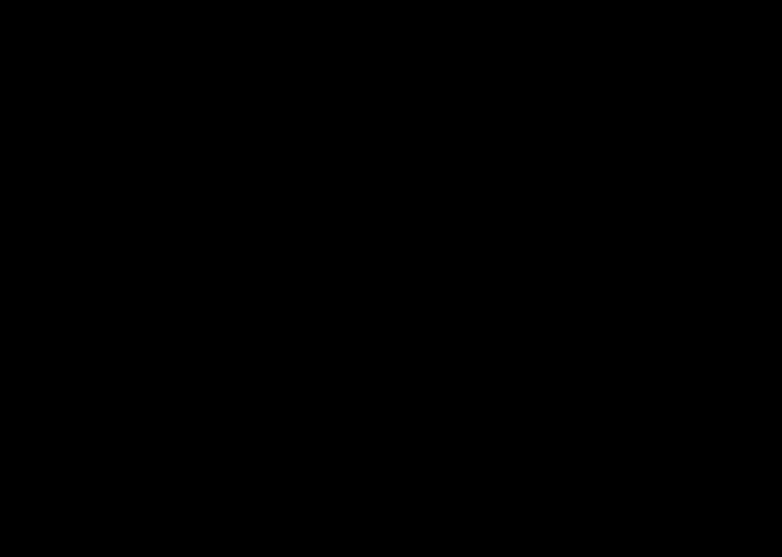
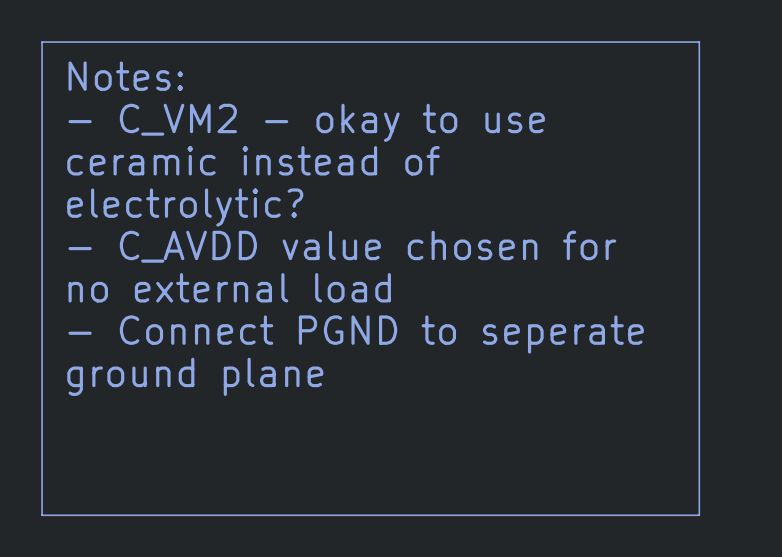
line: none -> (42, 42) (699, 42) (699, 515) (42, 515) (42, 42)
text: none -> Notes: (125, 76)
text: none -> - C_VM2 - okay to use (306, 122)
text: none -> ceramic instead of (253, 160)
text: none -> electrolytic? (185, 207)
text: none -> - C_AVDD value chosen for (342, 246)
text: none -> no external load (229, 287)
text: none -> - Connect PGND to seperate (356, 334)
text: none -> ground plane (195, 376)

